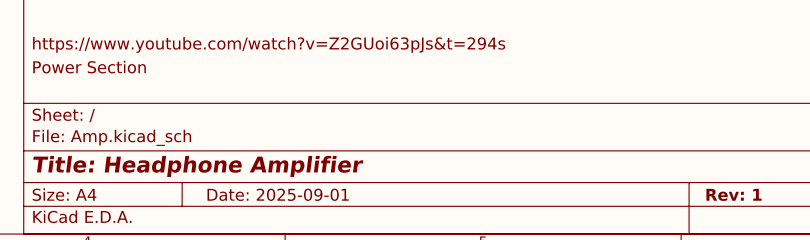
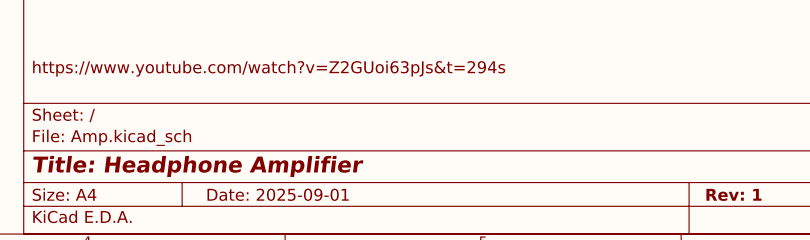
title block: https://www.youtube.com/watch?v=Z2GUoi63pJs&t=294s (269, 44) -> none
title block: Power Section (89, 67) -> https://www.youtube.com/watch?v=Z2GUoi63pJs&t=294s (269, 68)

